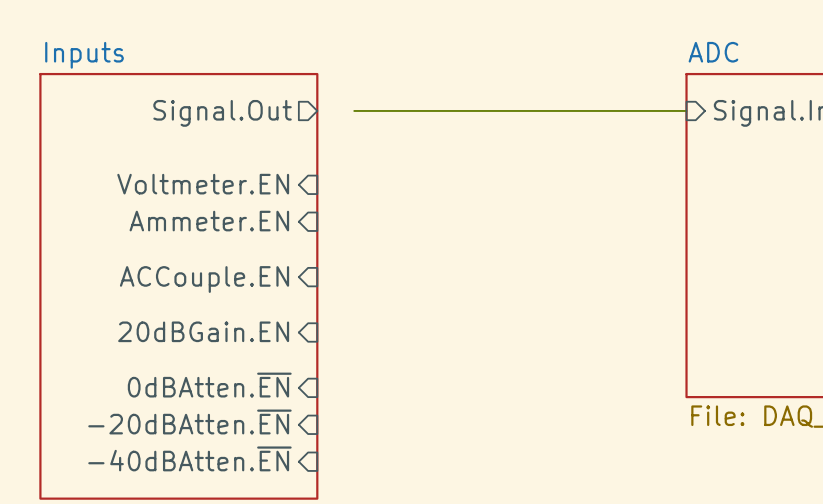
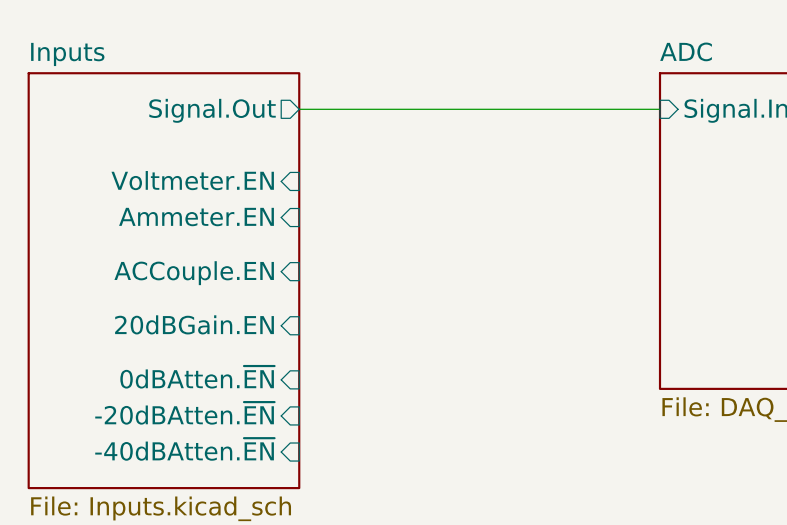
wire: none -> (299, 109) (335, 109)

